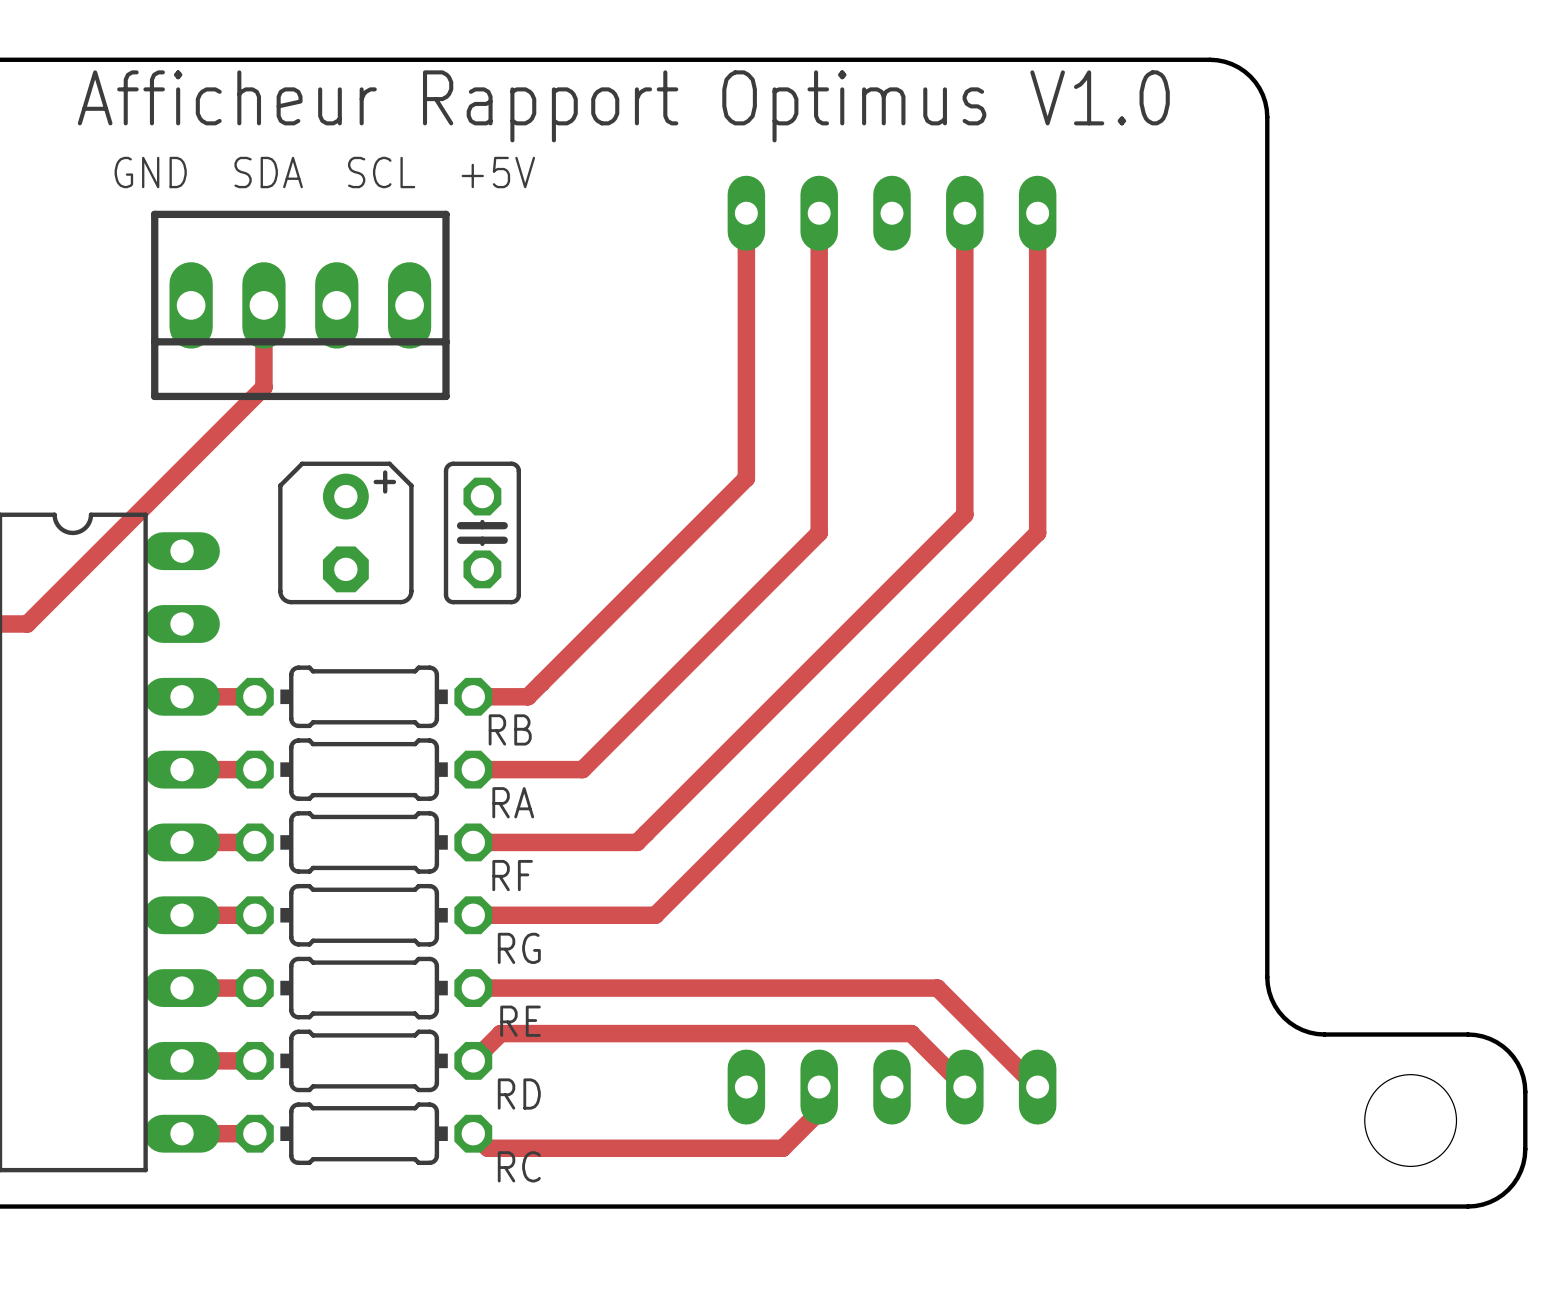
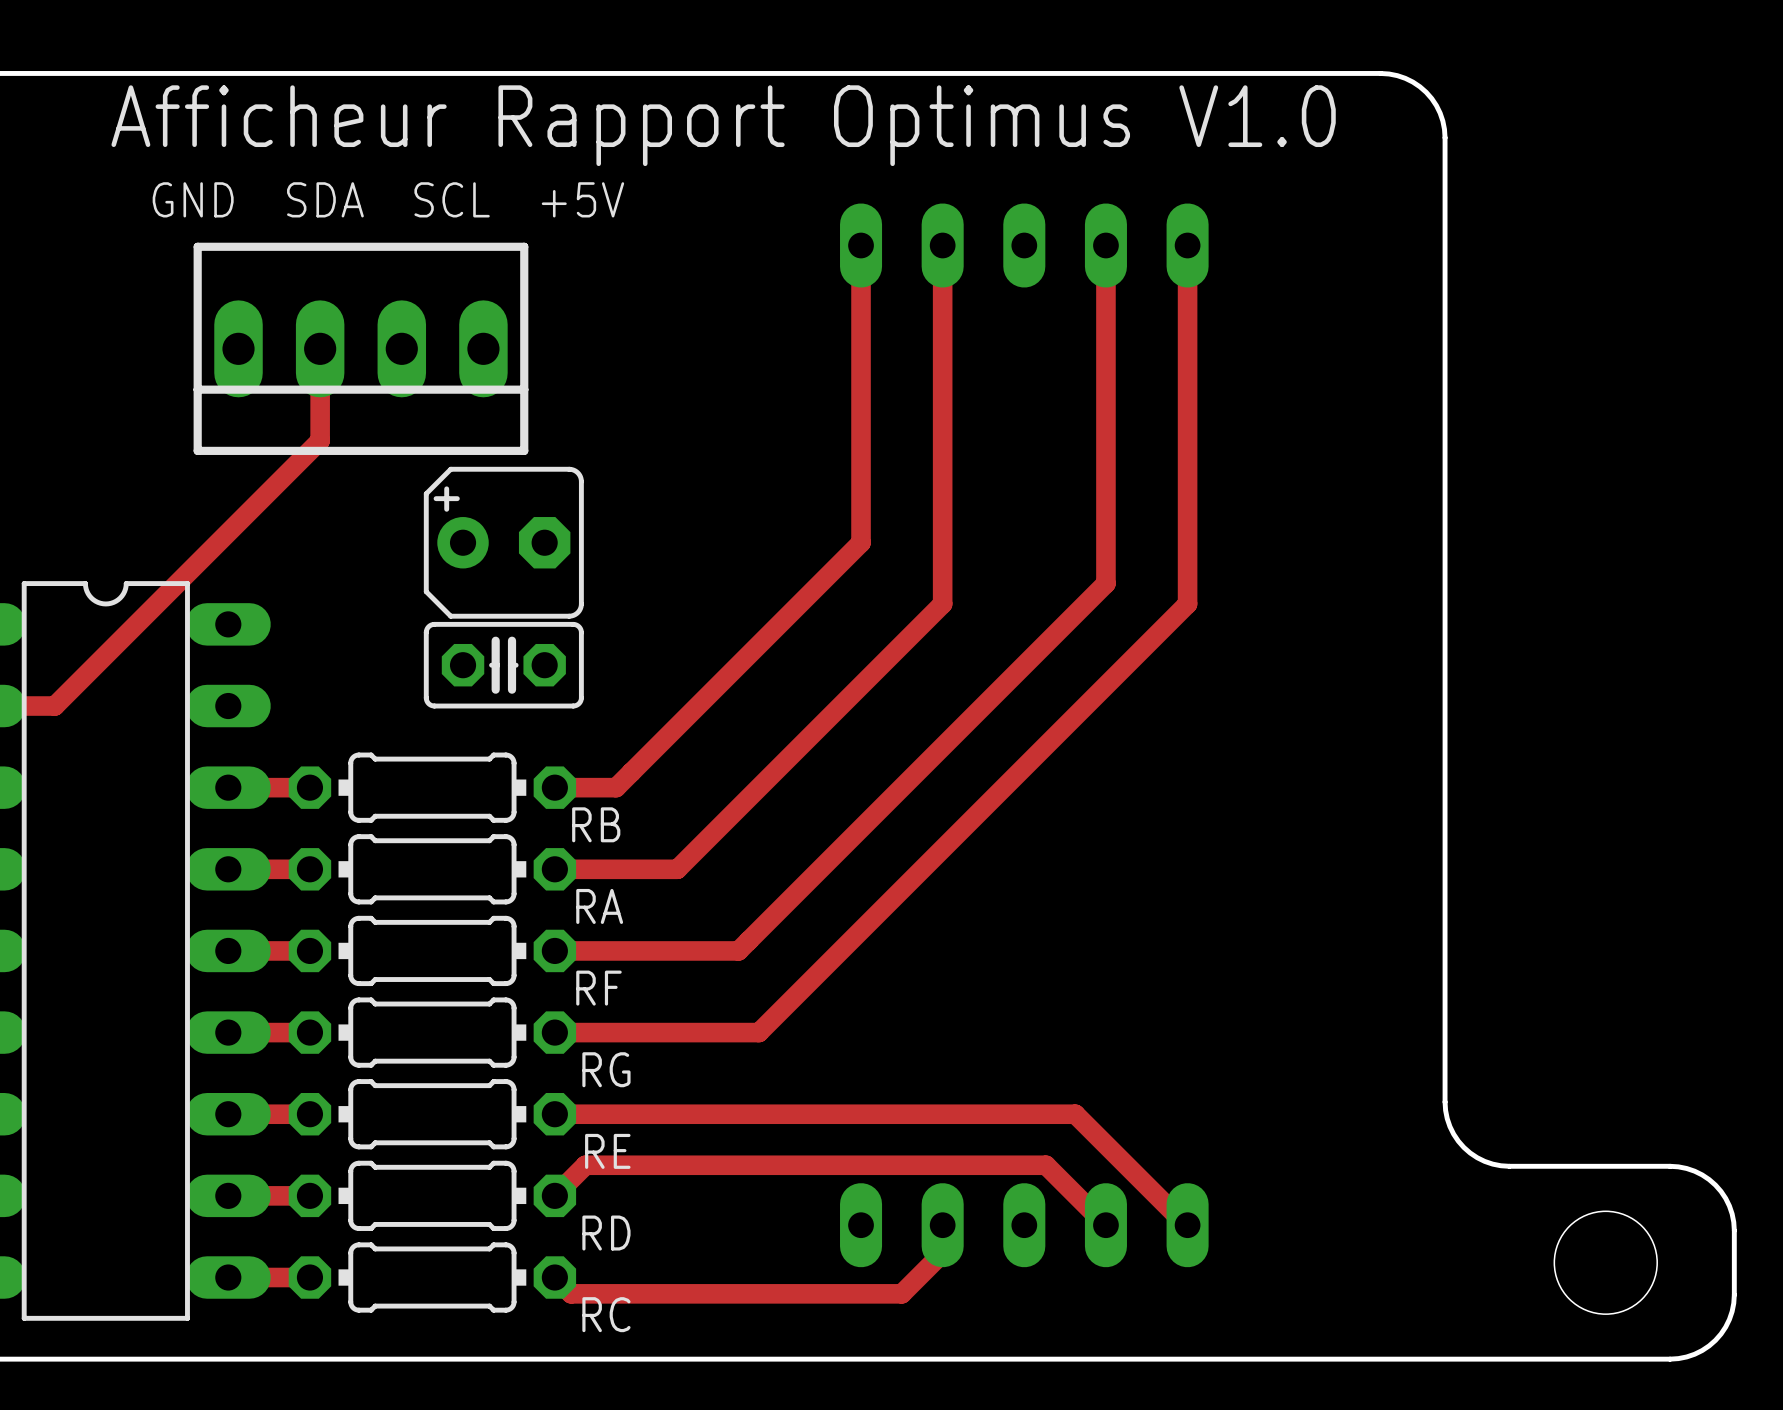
part rotation: 0° (345, 532) -> 90° counterclockwise (503, 542)
part position: (345, 532) -> (503, 542)
part rotation: 0° (482, 532) -> 90° clockwise (503, 665)

